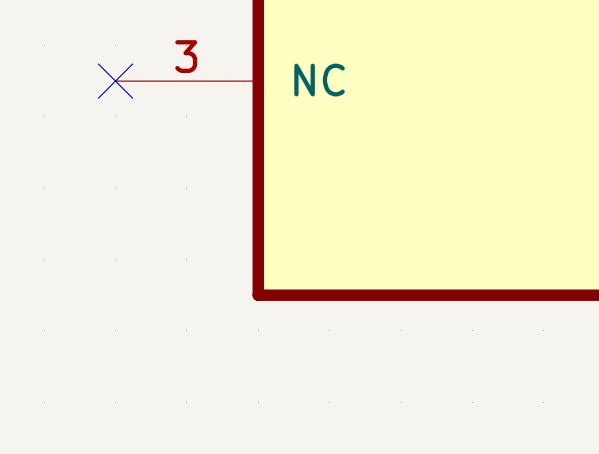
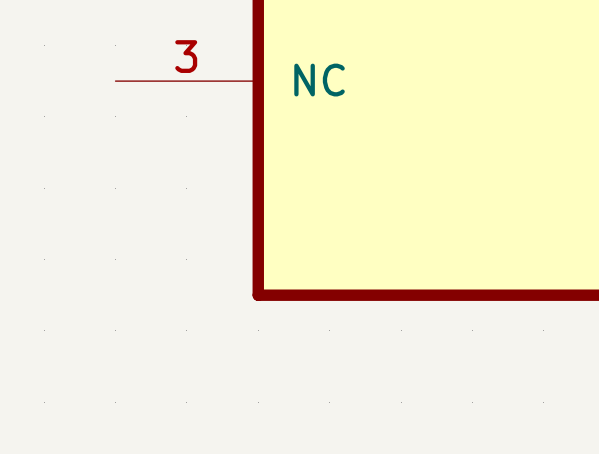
no-connect mark: (115, 81) -> none

